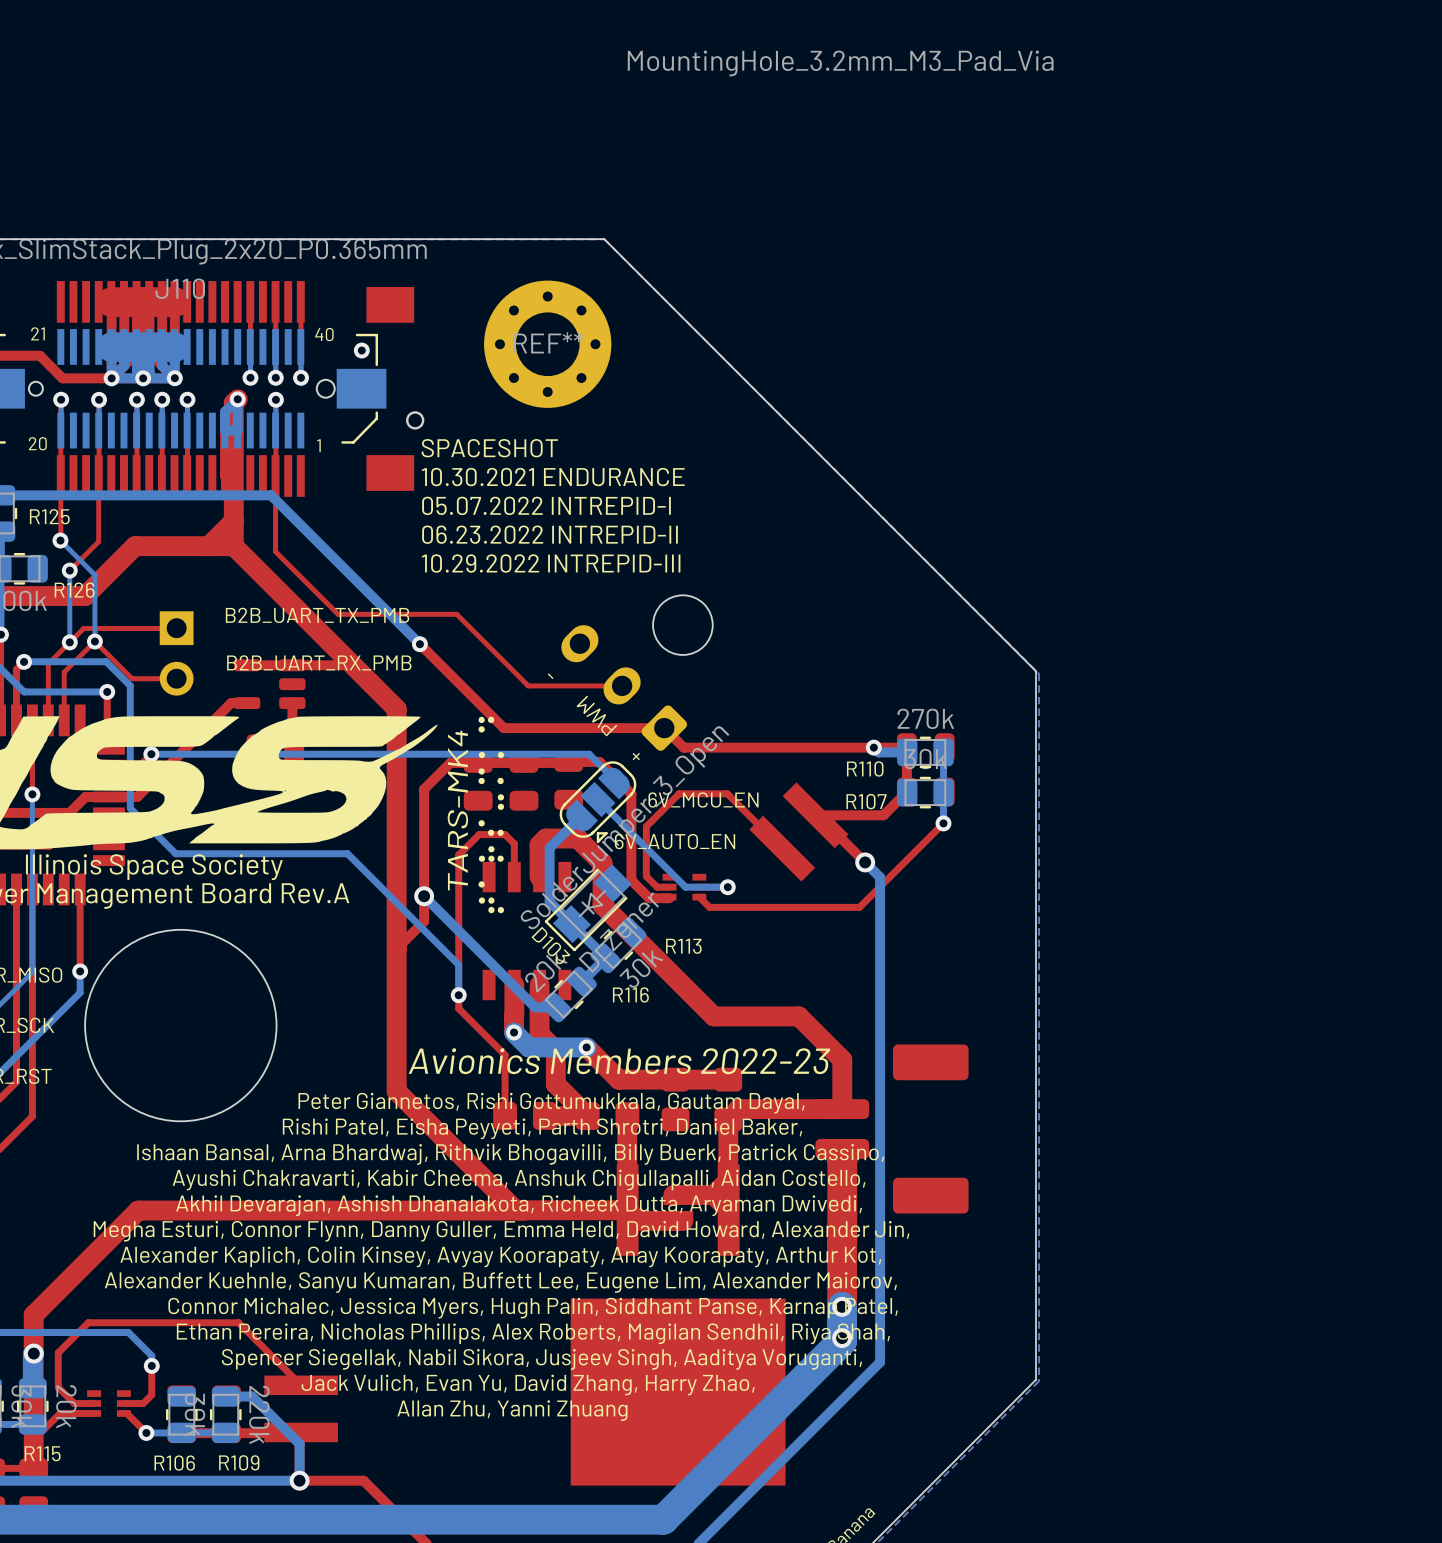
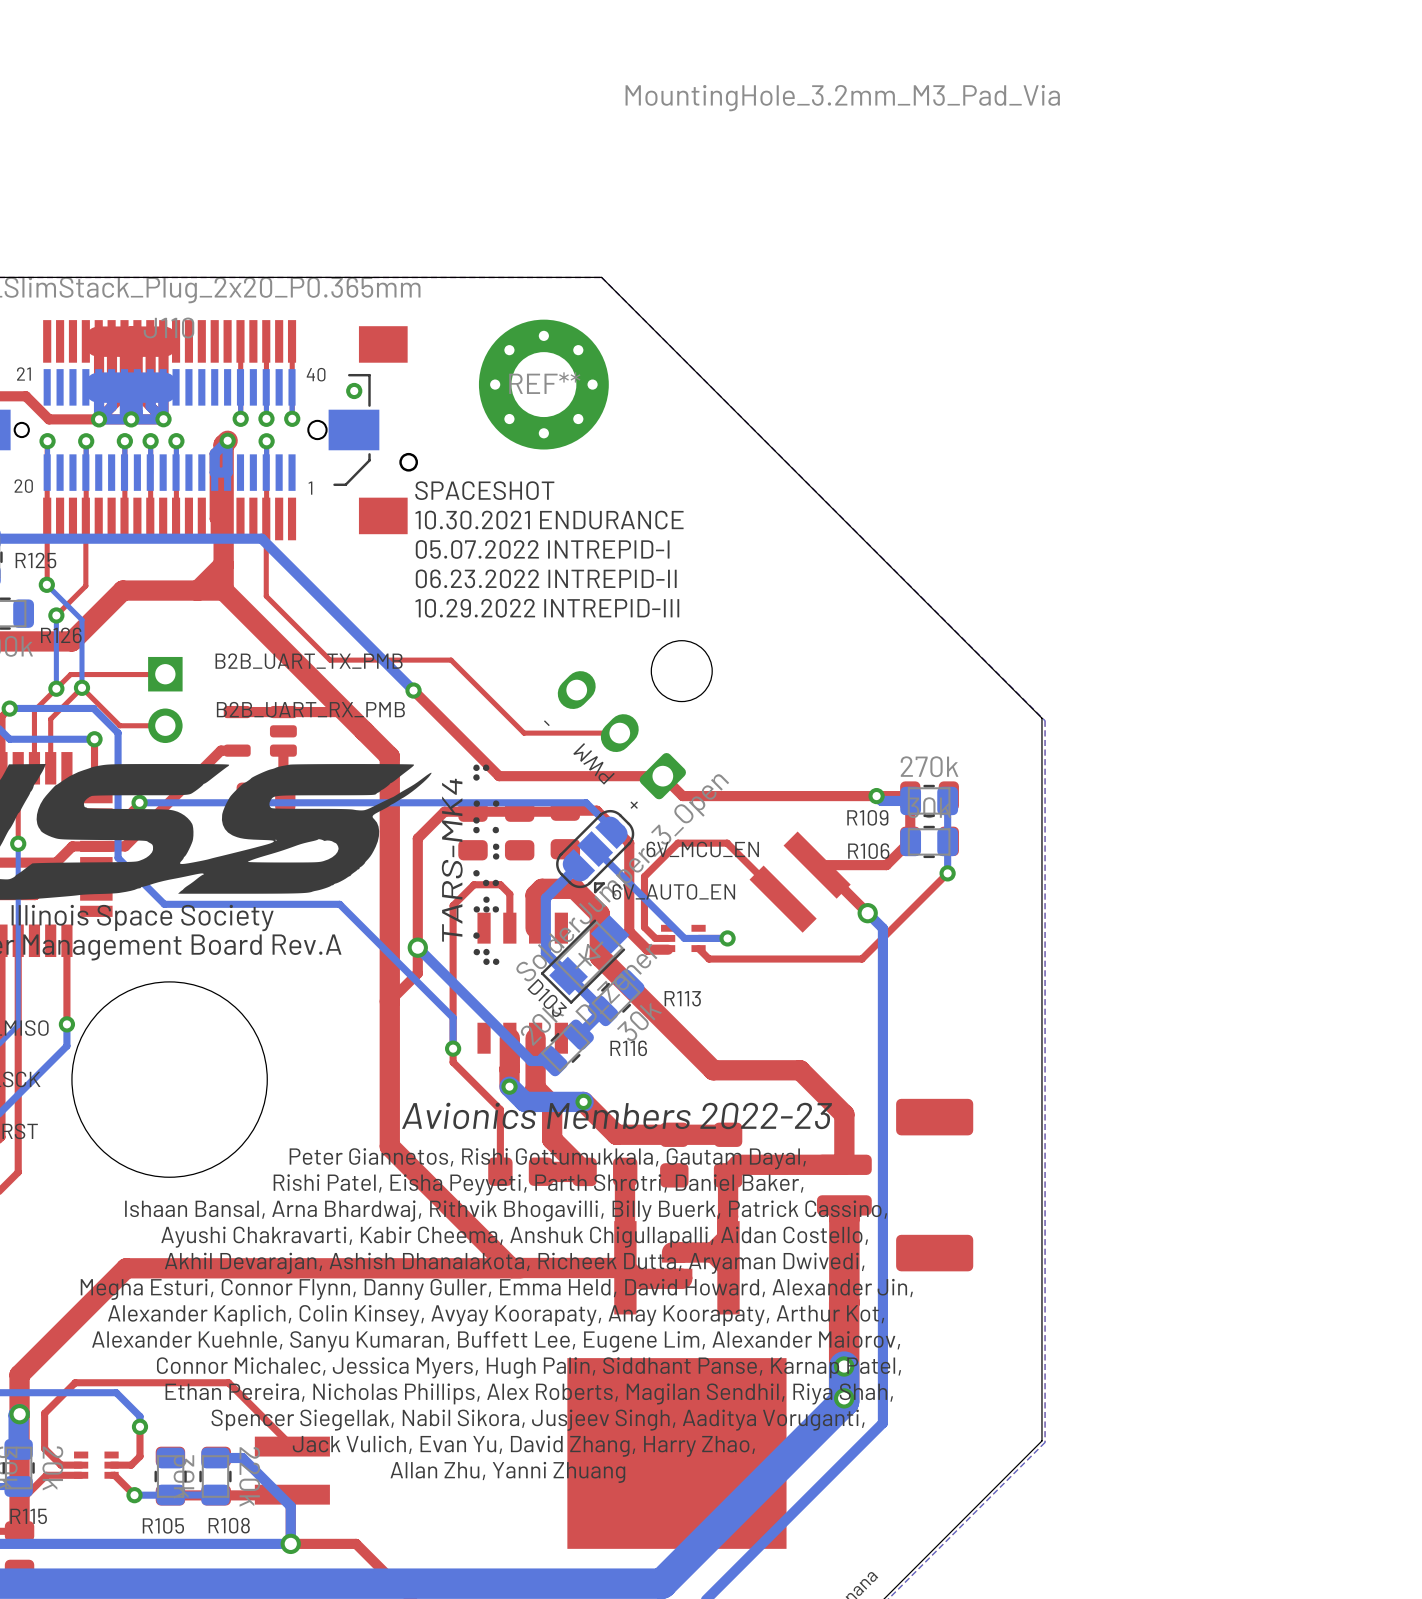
R110 name: R110 (865, 768) -> R109 (867, 817)
R107 name: R107 (866, 801) -> R106 (868, 851)
R109 name: R109 (239, 1462) -> R108 (229, 1525)
R106 name: R106 (174, 1463) -> R105 (163, 1525)

